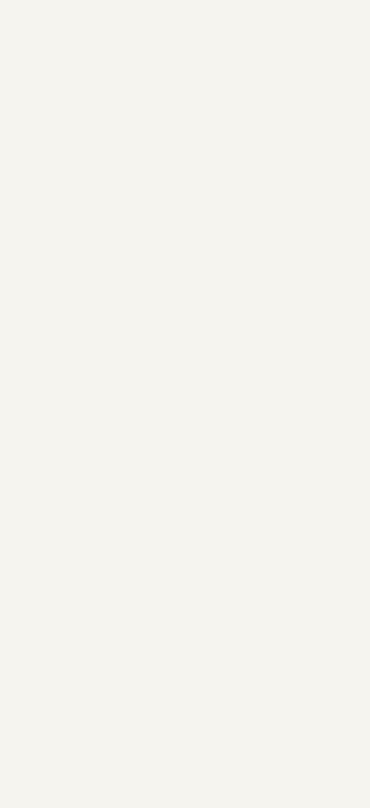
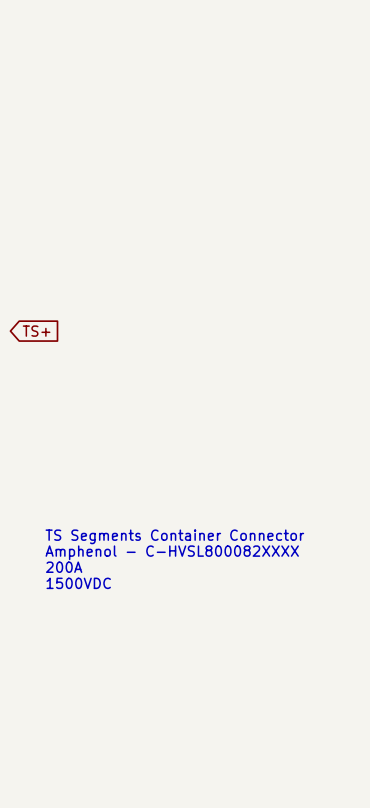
global label: none -> TS+ (36, 331)
text: none -> TS Segments Container Connector (174, 536)
text: none -> Amphenol - C-HVSL800082XXXX (172, 552)
text: none -> 200A (64, 567)
text: none -> 1500VDC (78, 583)

